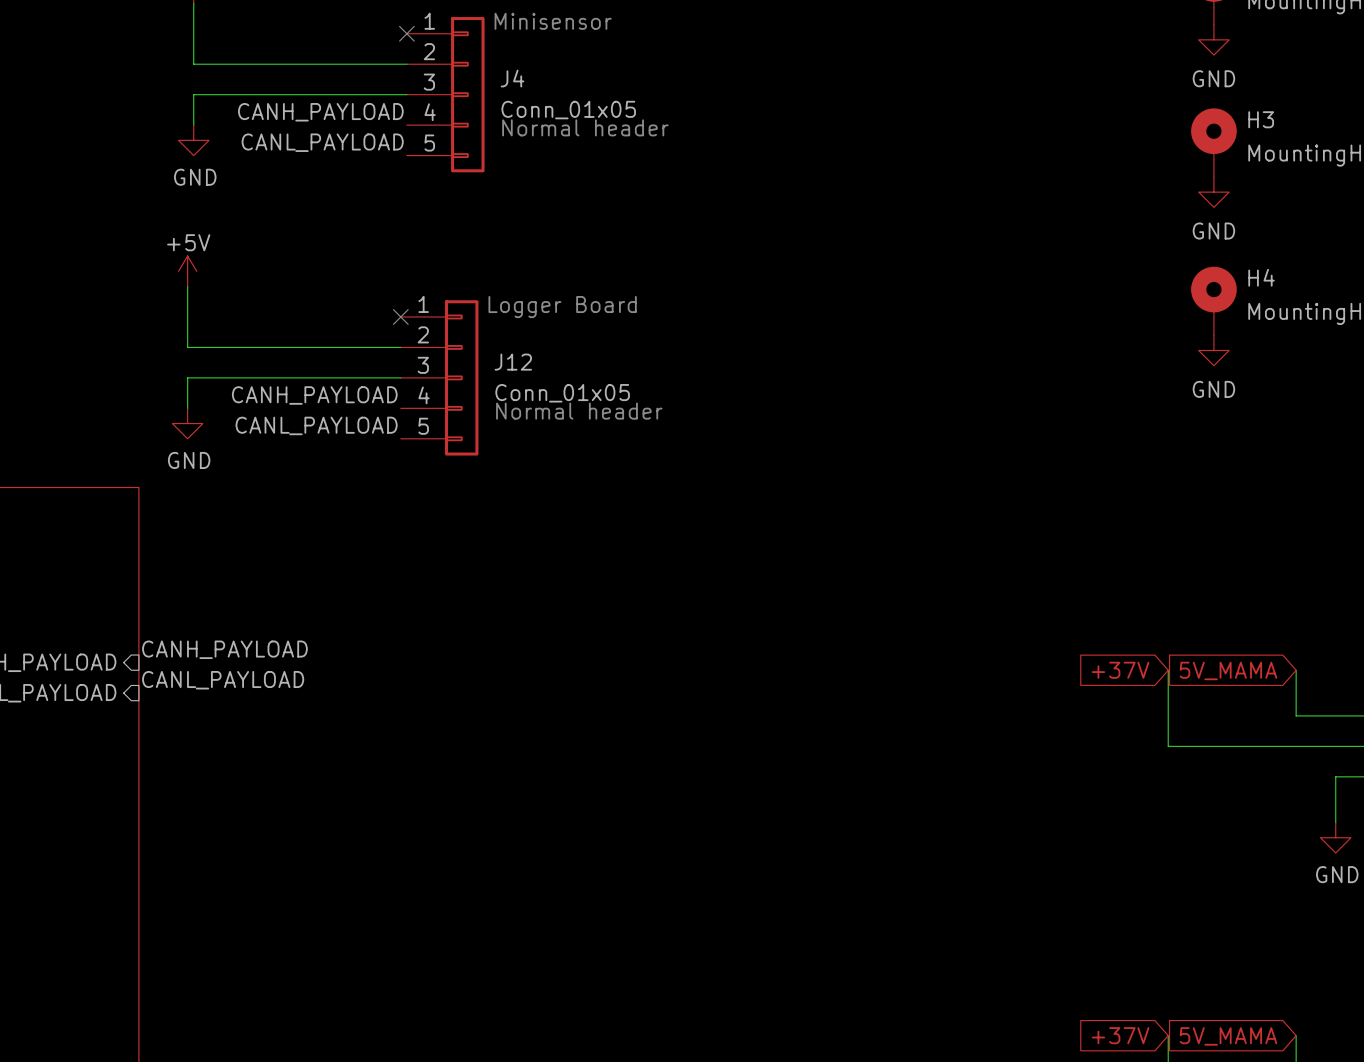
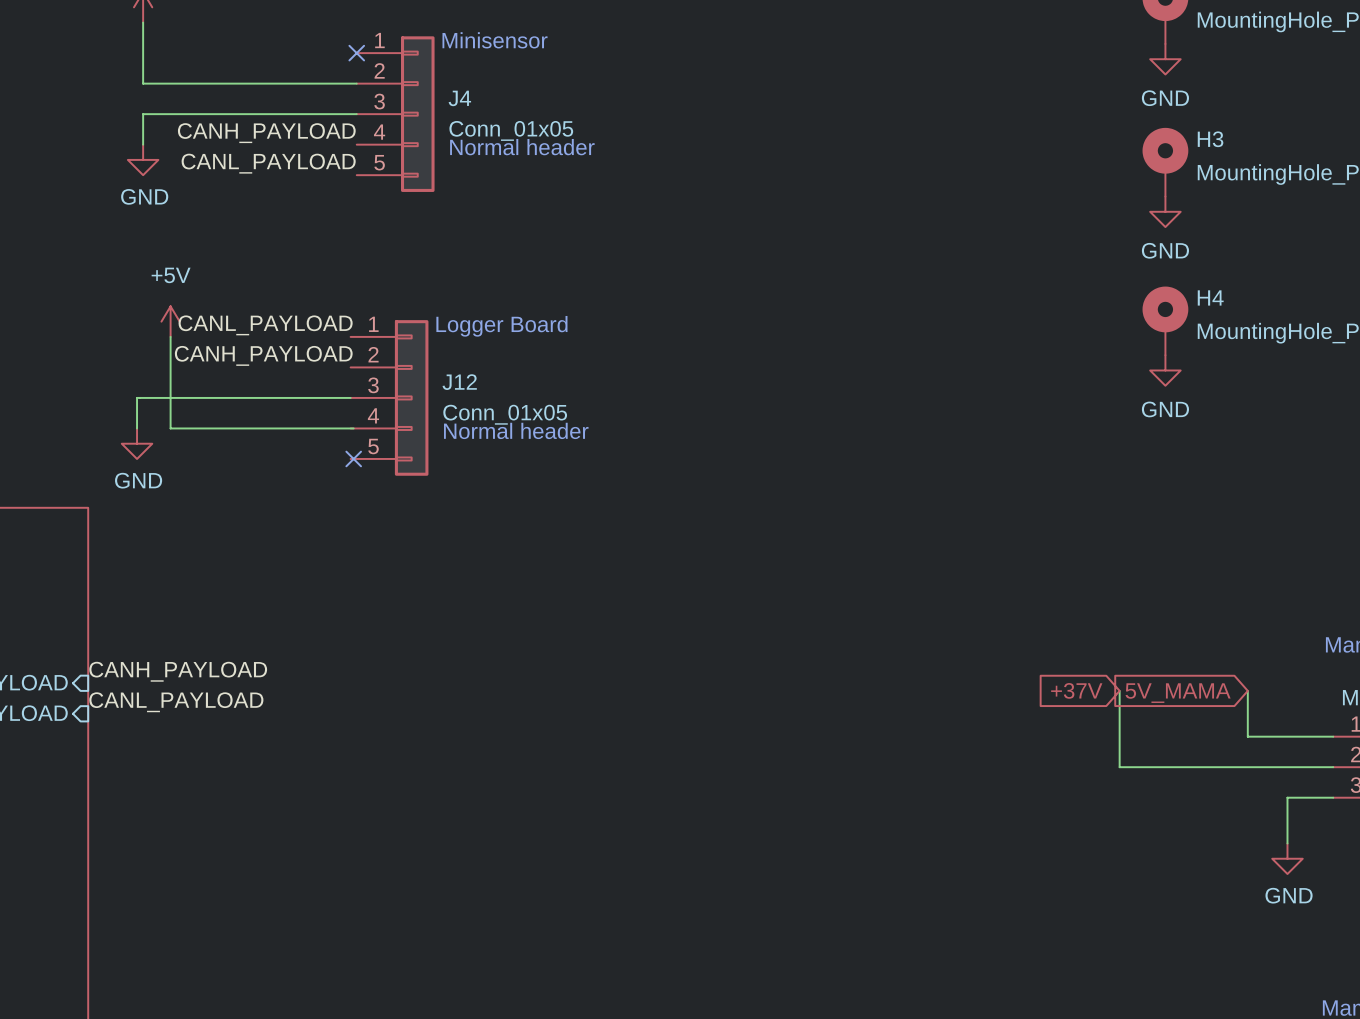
power symbol text position: +5V (188, 242) -> +5V (171, 275)
power symbol position: +5V (187, 271) -> +5V (170, 321)
wire: (187, 286) (187, 347) (400, 347) -> none
wire: none -> (170, 336) (170, 428) (353, 428)
no-connect mark: (400, 316) -> none
label position: CANH_PAYLOAD (314, 395) -> CANH_PAYLOAD (263, 355)
label position: CANL_PAYLOAD (316, 425) -> CANL_PAYLOAD (265, 325)
no-connect mark: none -> (353, 458)

